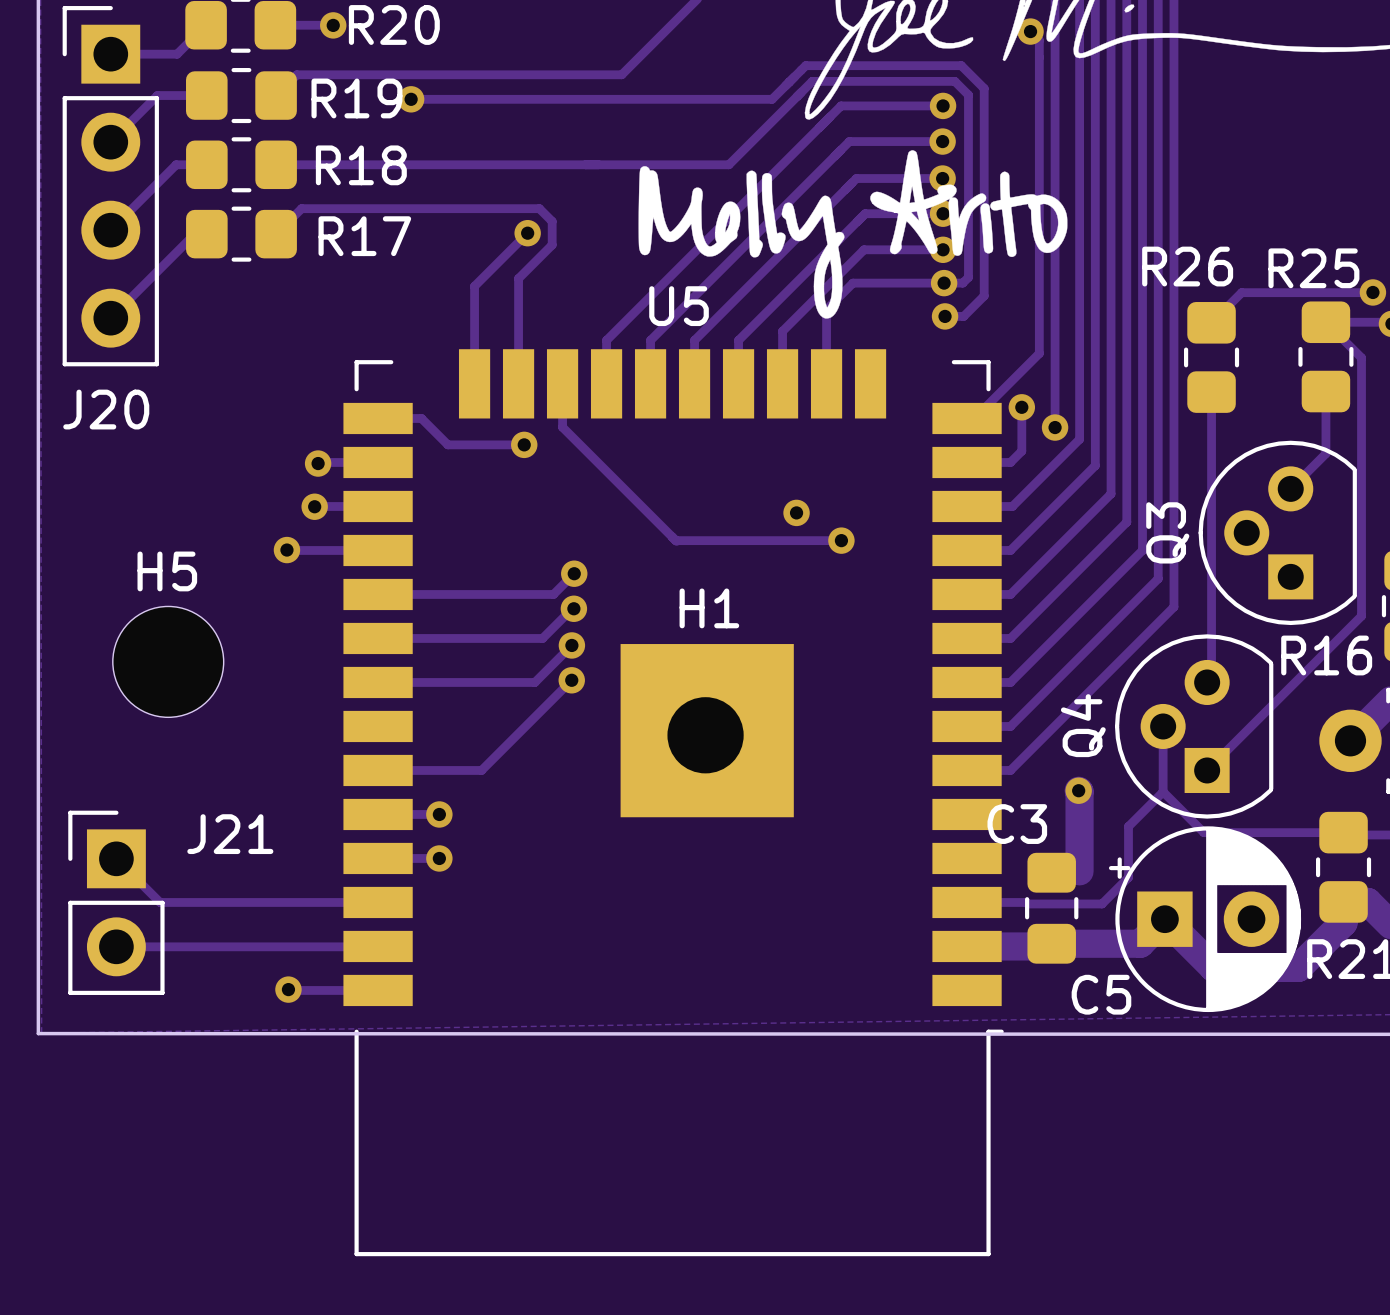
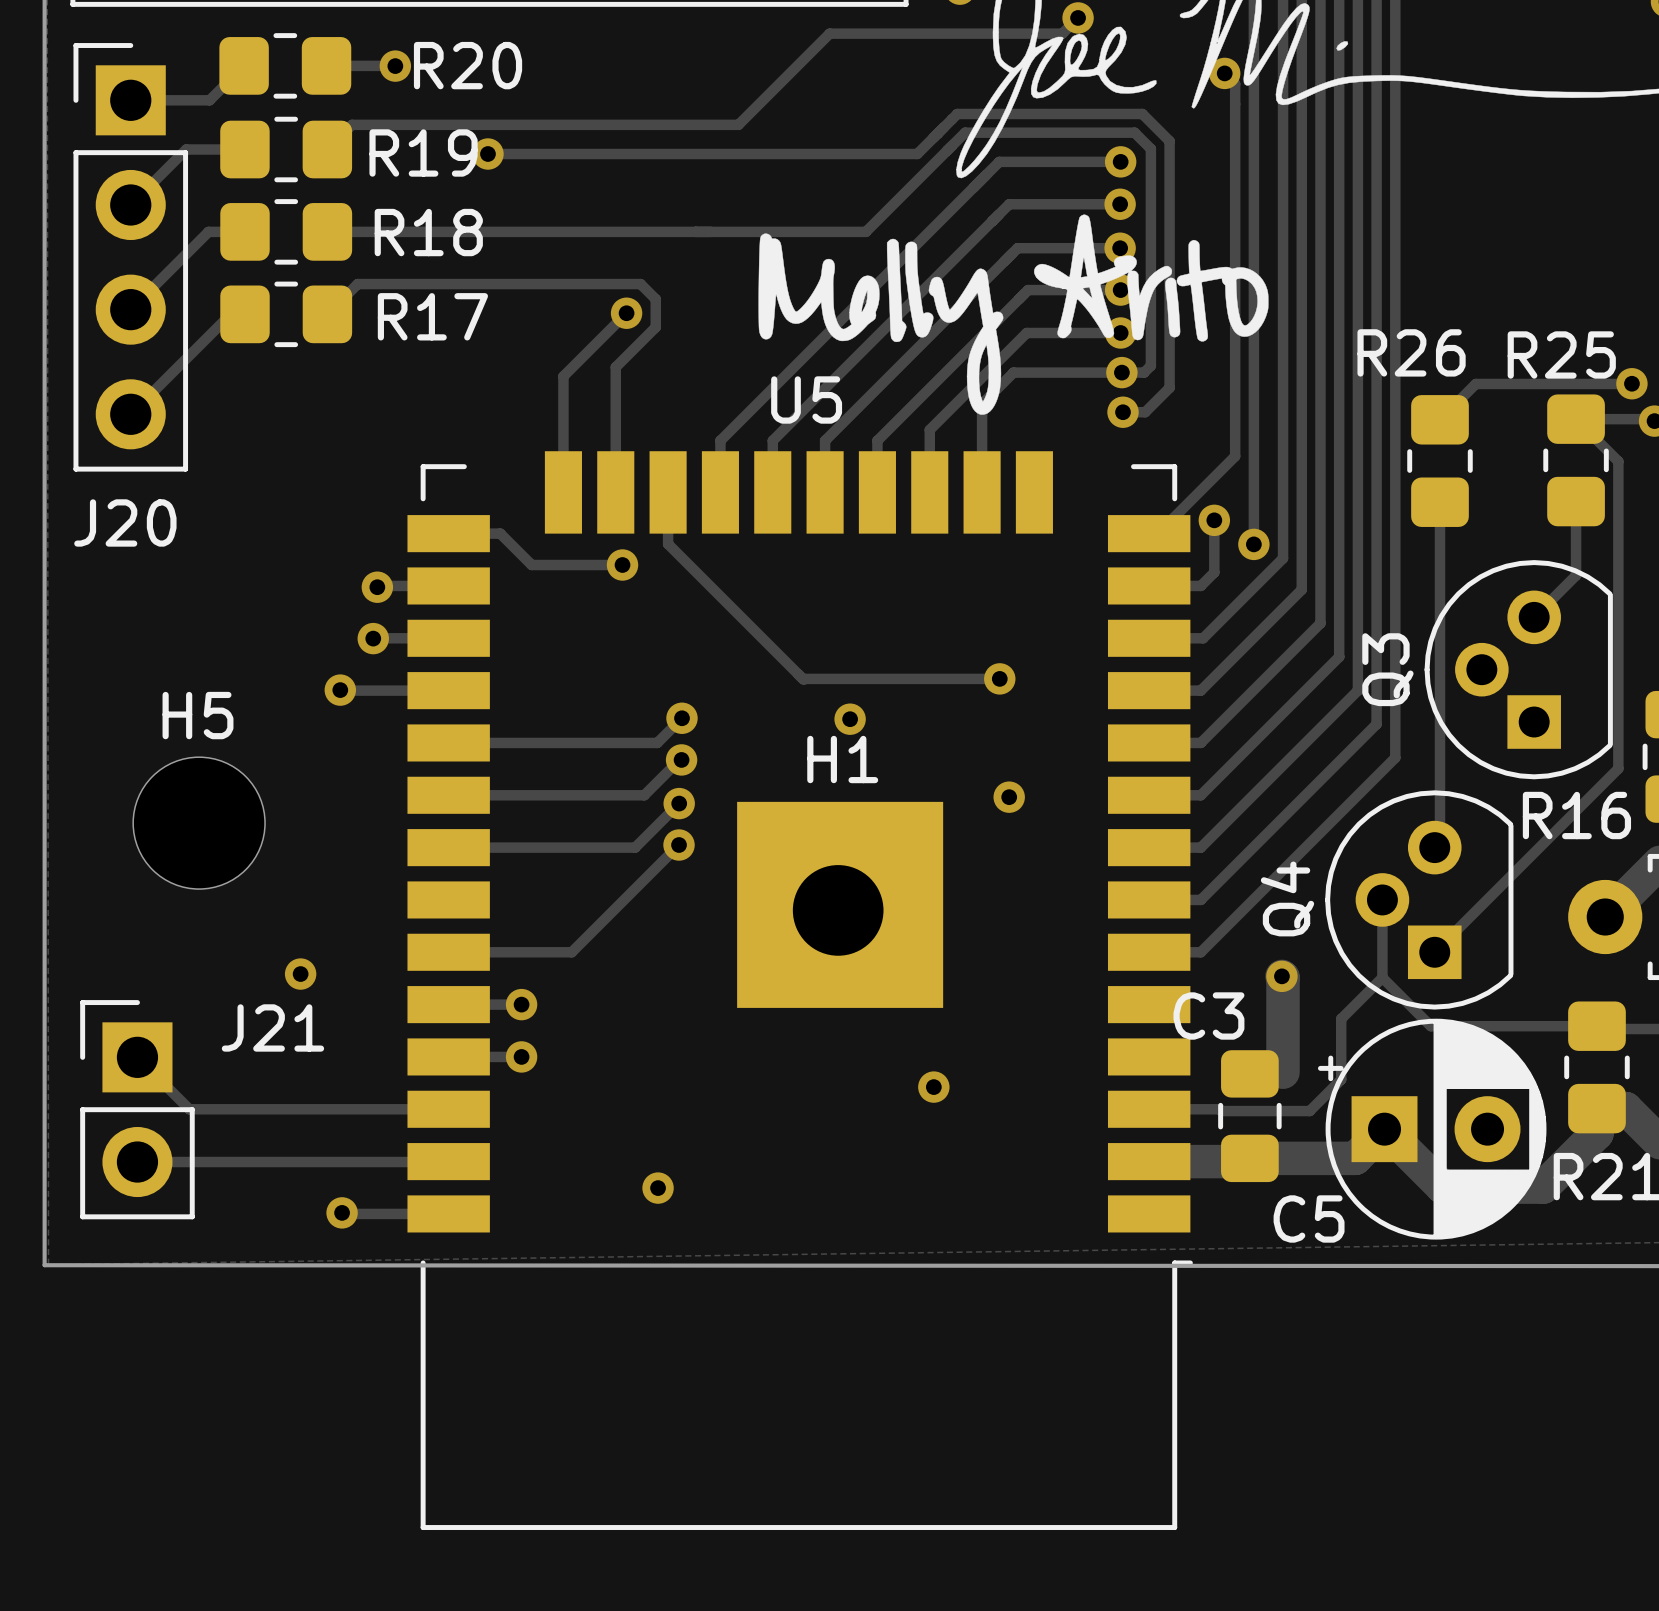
via: (796, 512) -> none
via: none -> (850, 719)
via: none -> (1009, 797)
via: none -> (300, 974)
via: none -> (933, 1087)
via: none -> (658, 1188)

